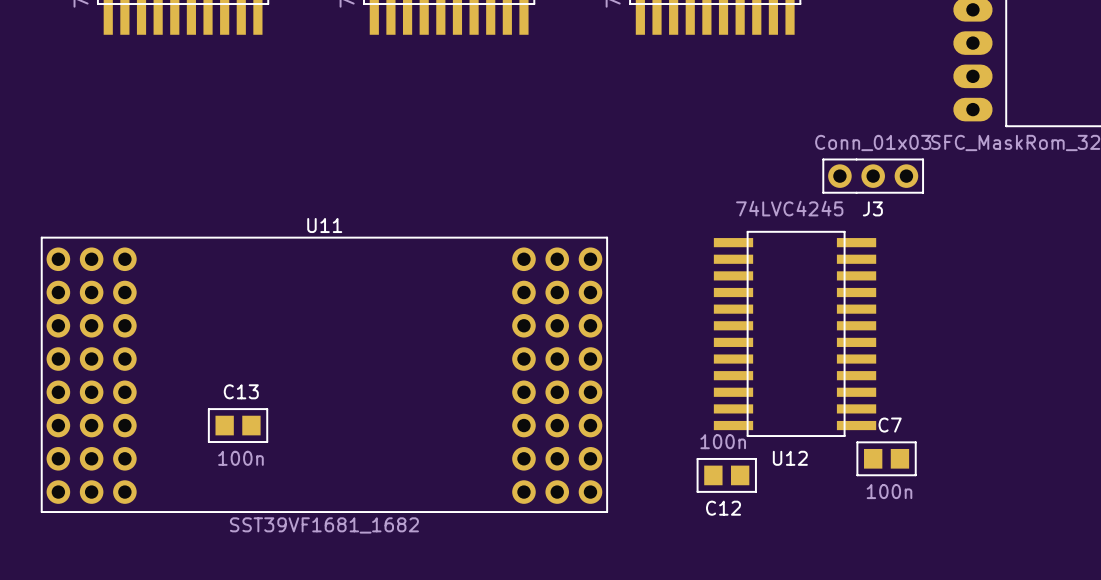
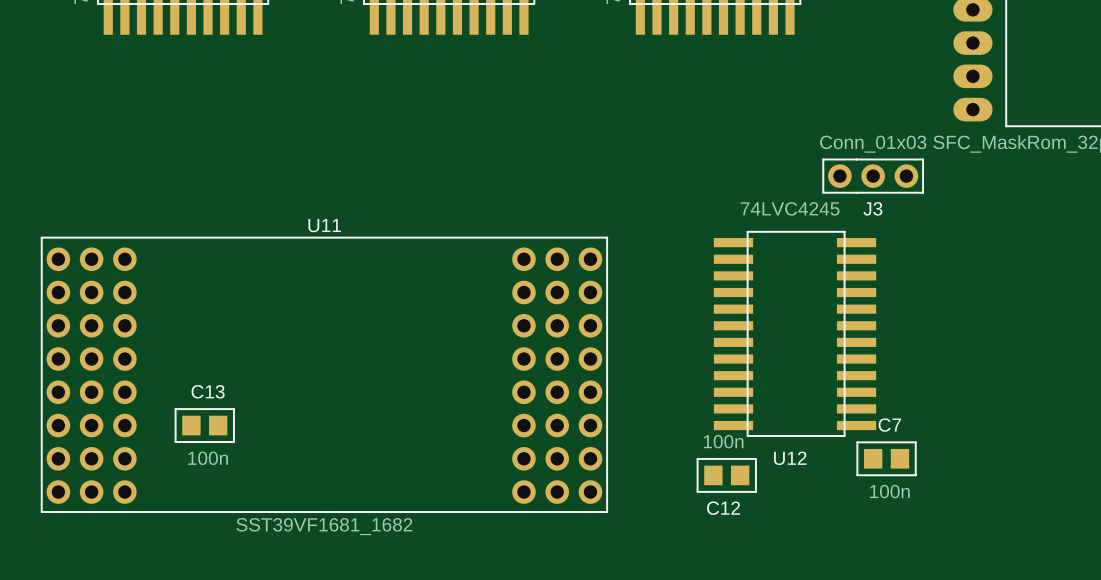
C13 position: (238, 425) -> (204, 425)

